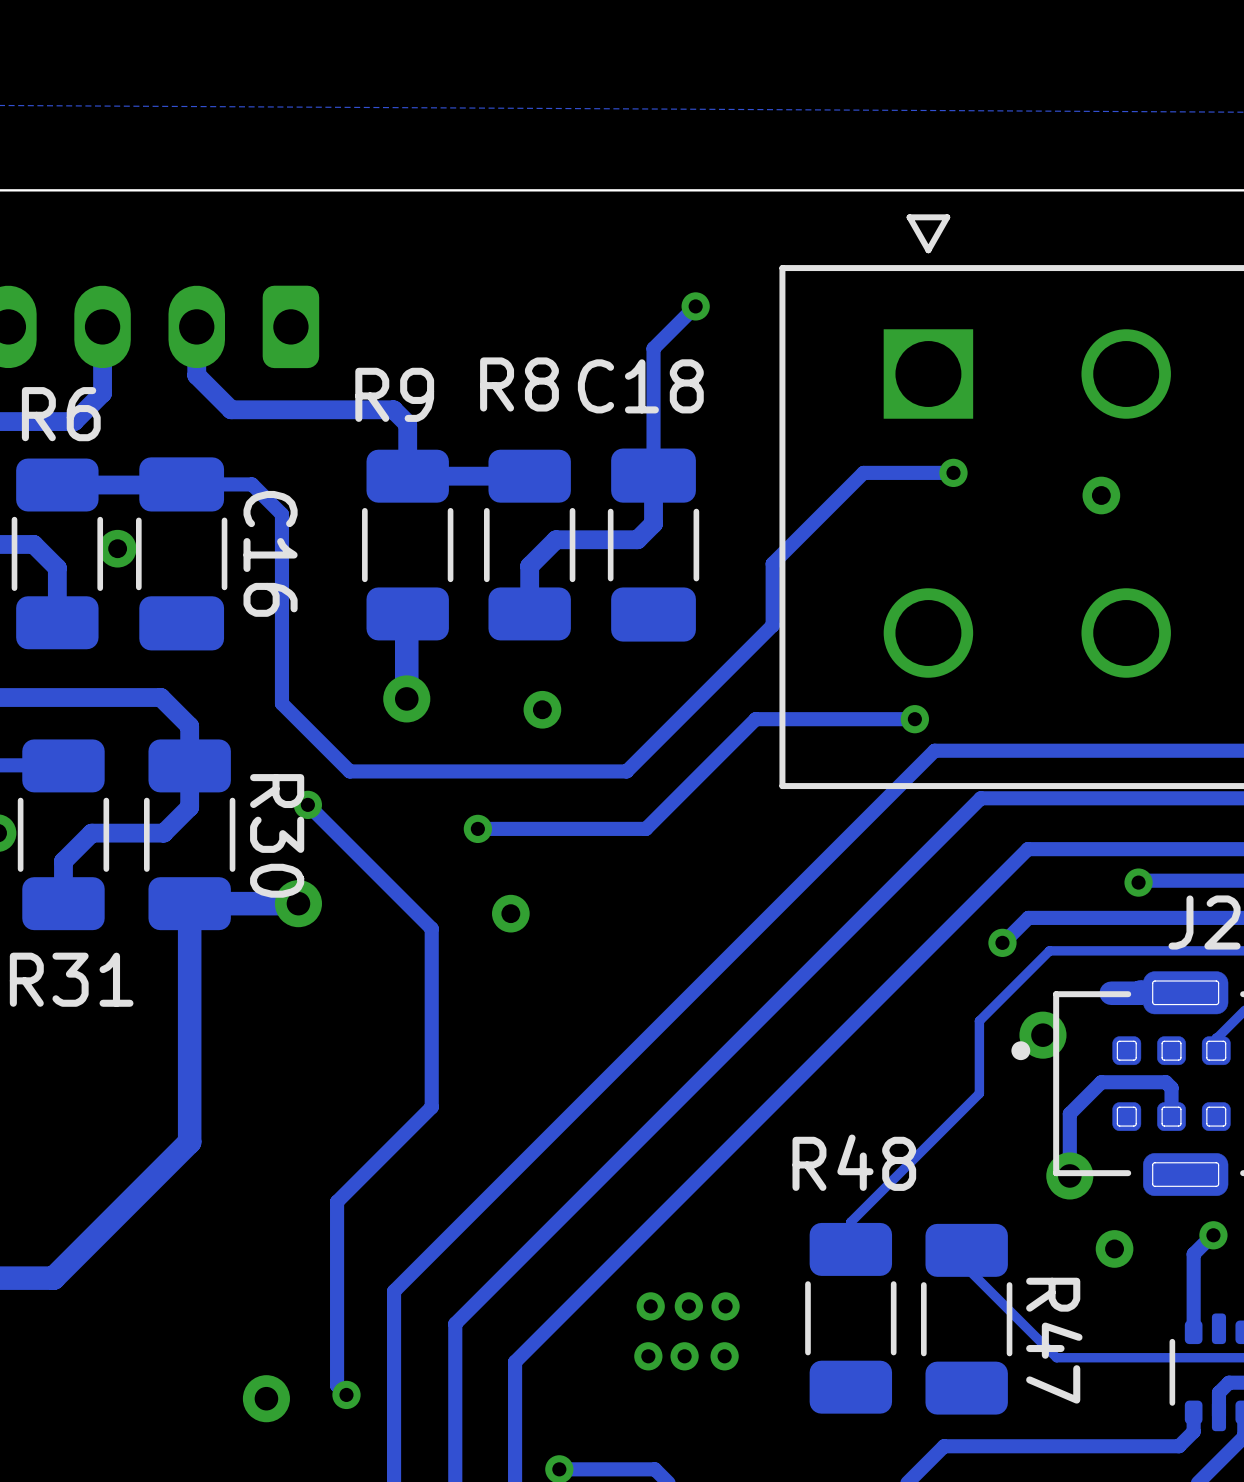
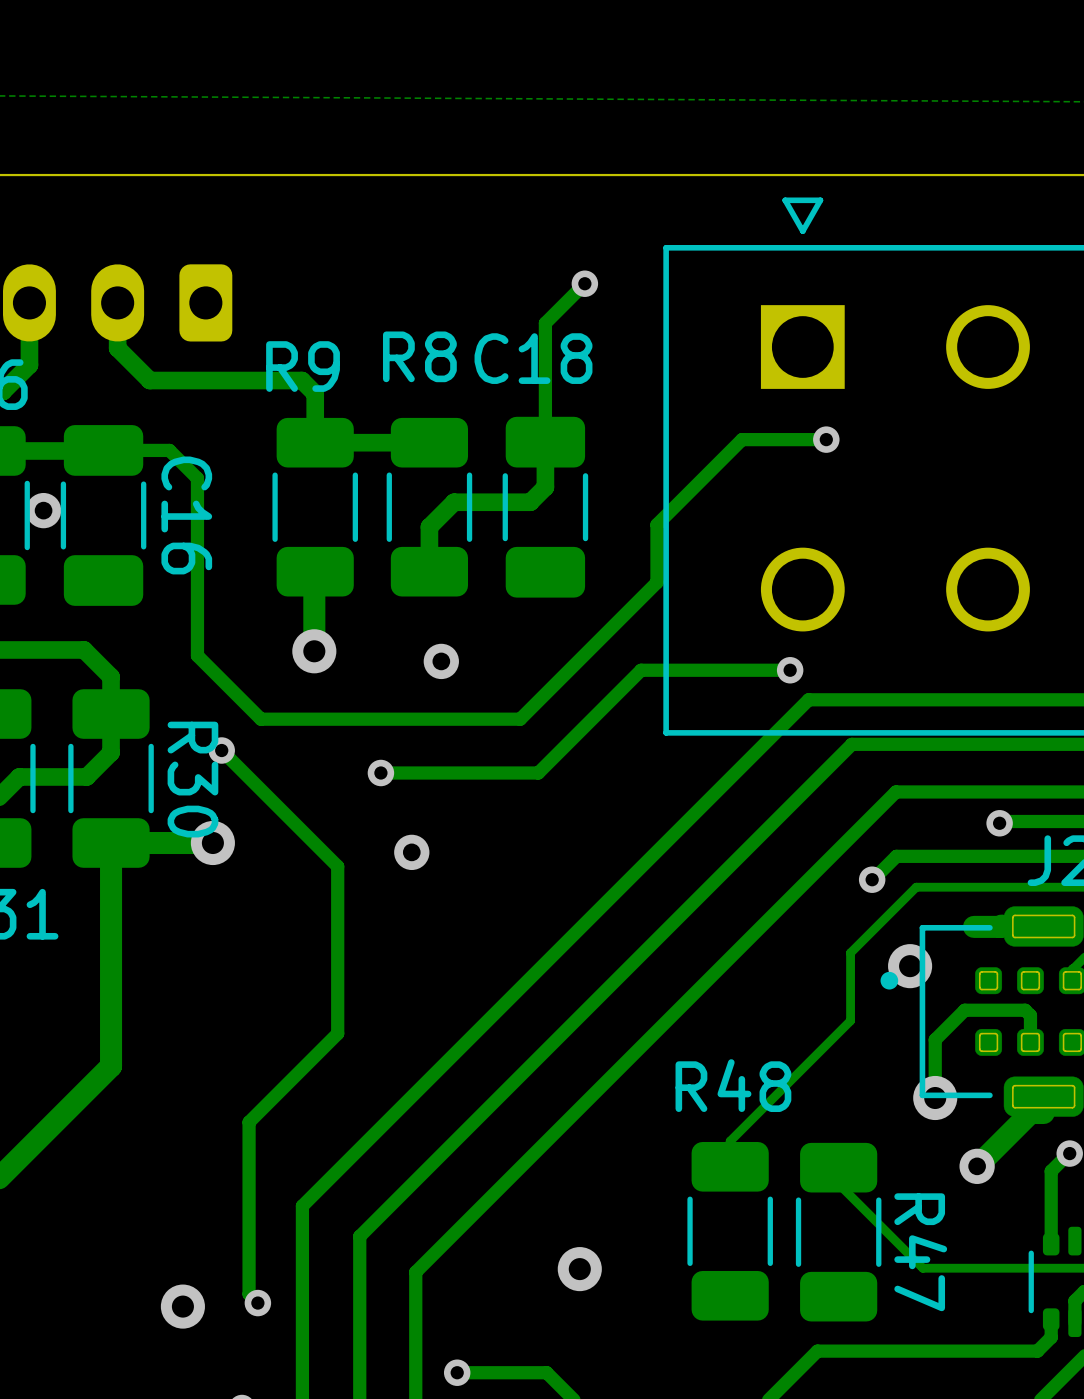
via: (1101, 495) -> none
track: none -> (1043, 1112) (1030, 1112) (977, 1166)
via: (650, 1306) -> none
via: (688, 1306) -> none
via: (725, 1306) -> none
via size: [670, 1342, 699, 1371] -> [557, 1247, 602, 1292]
via: (648, 1356) -> none
via: (724, 1356) -> none

